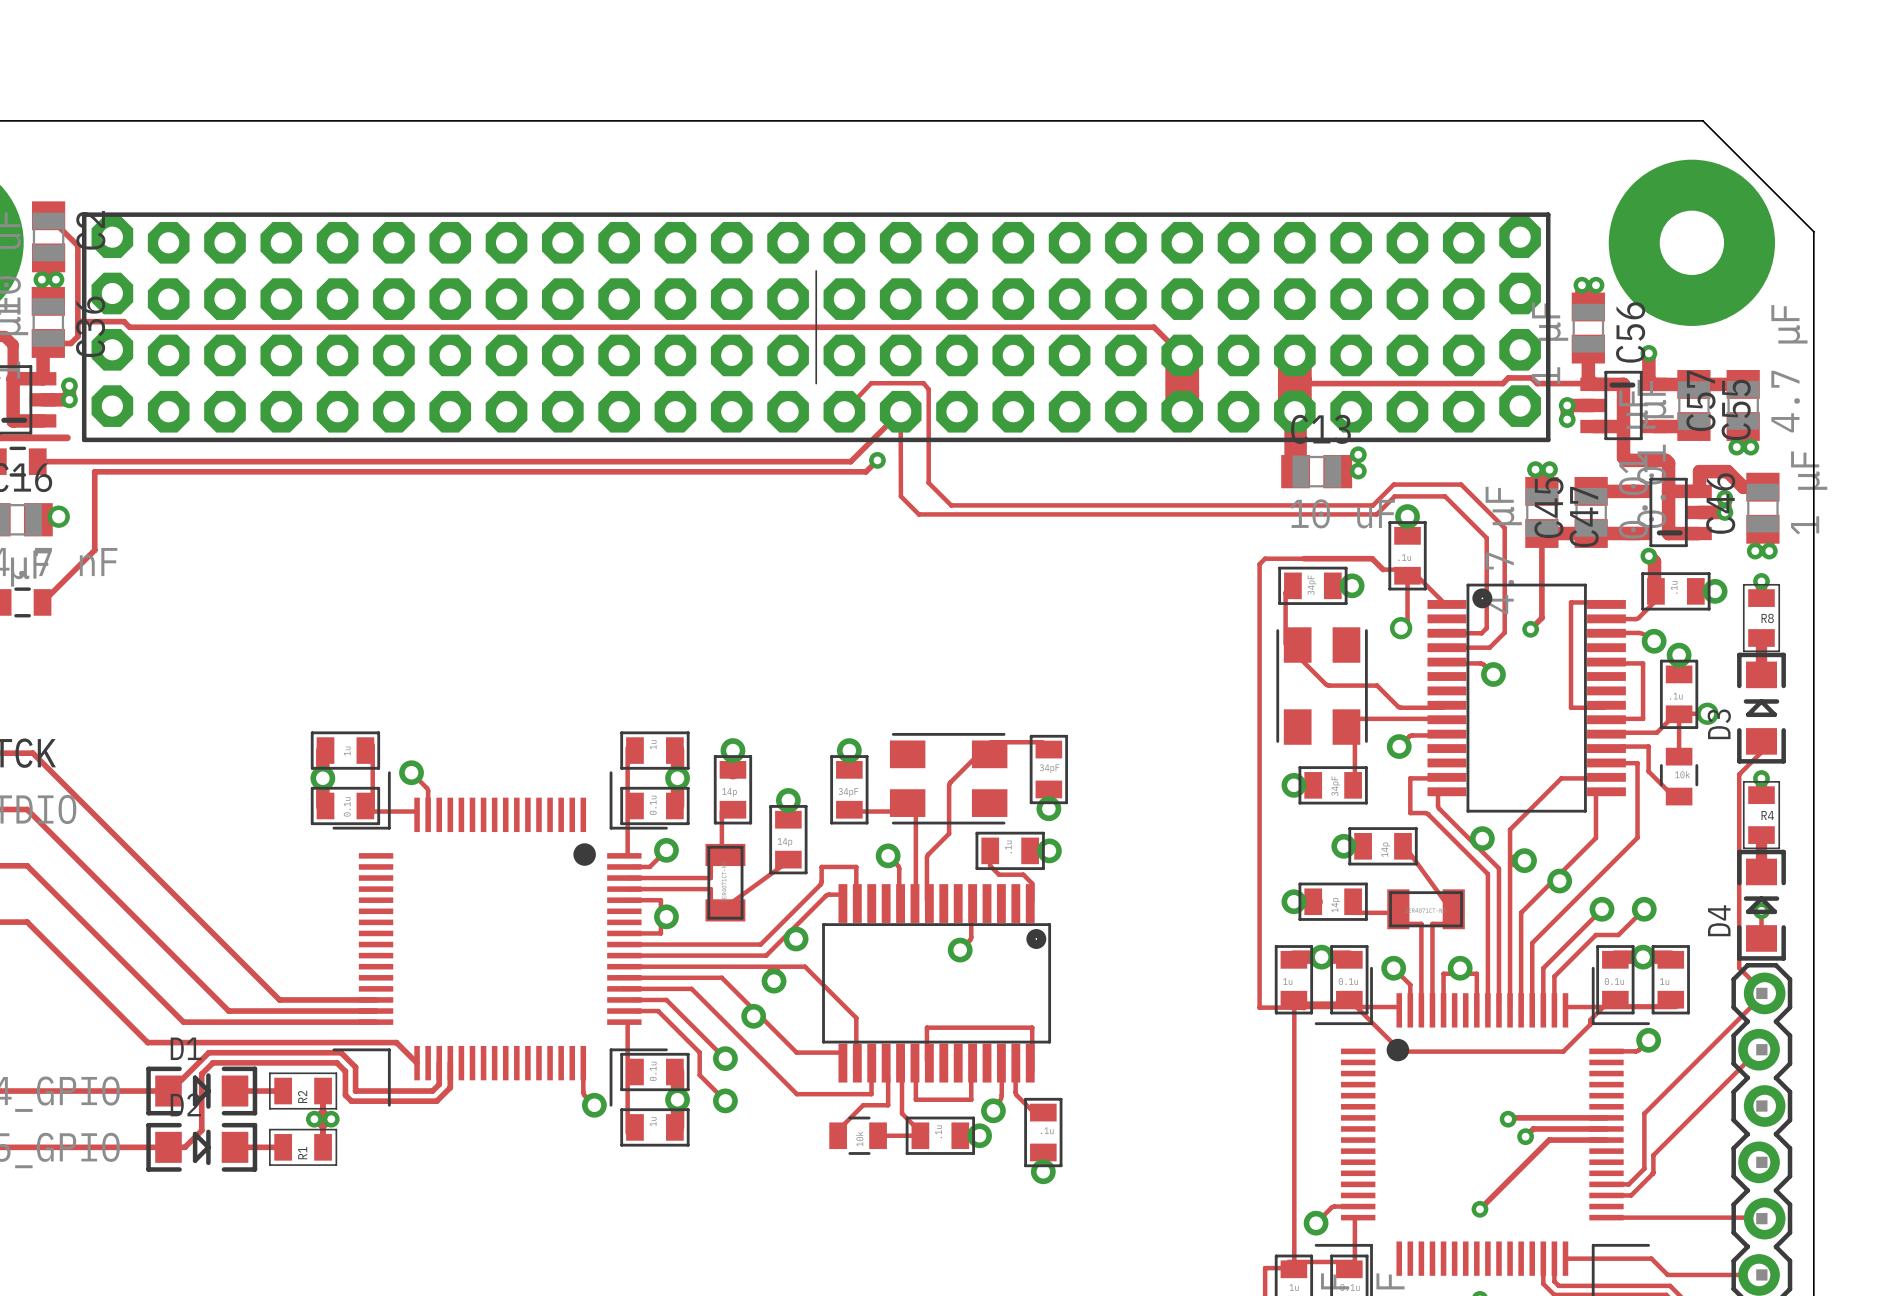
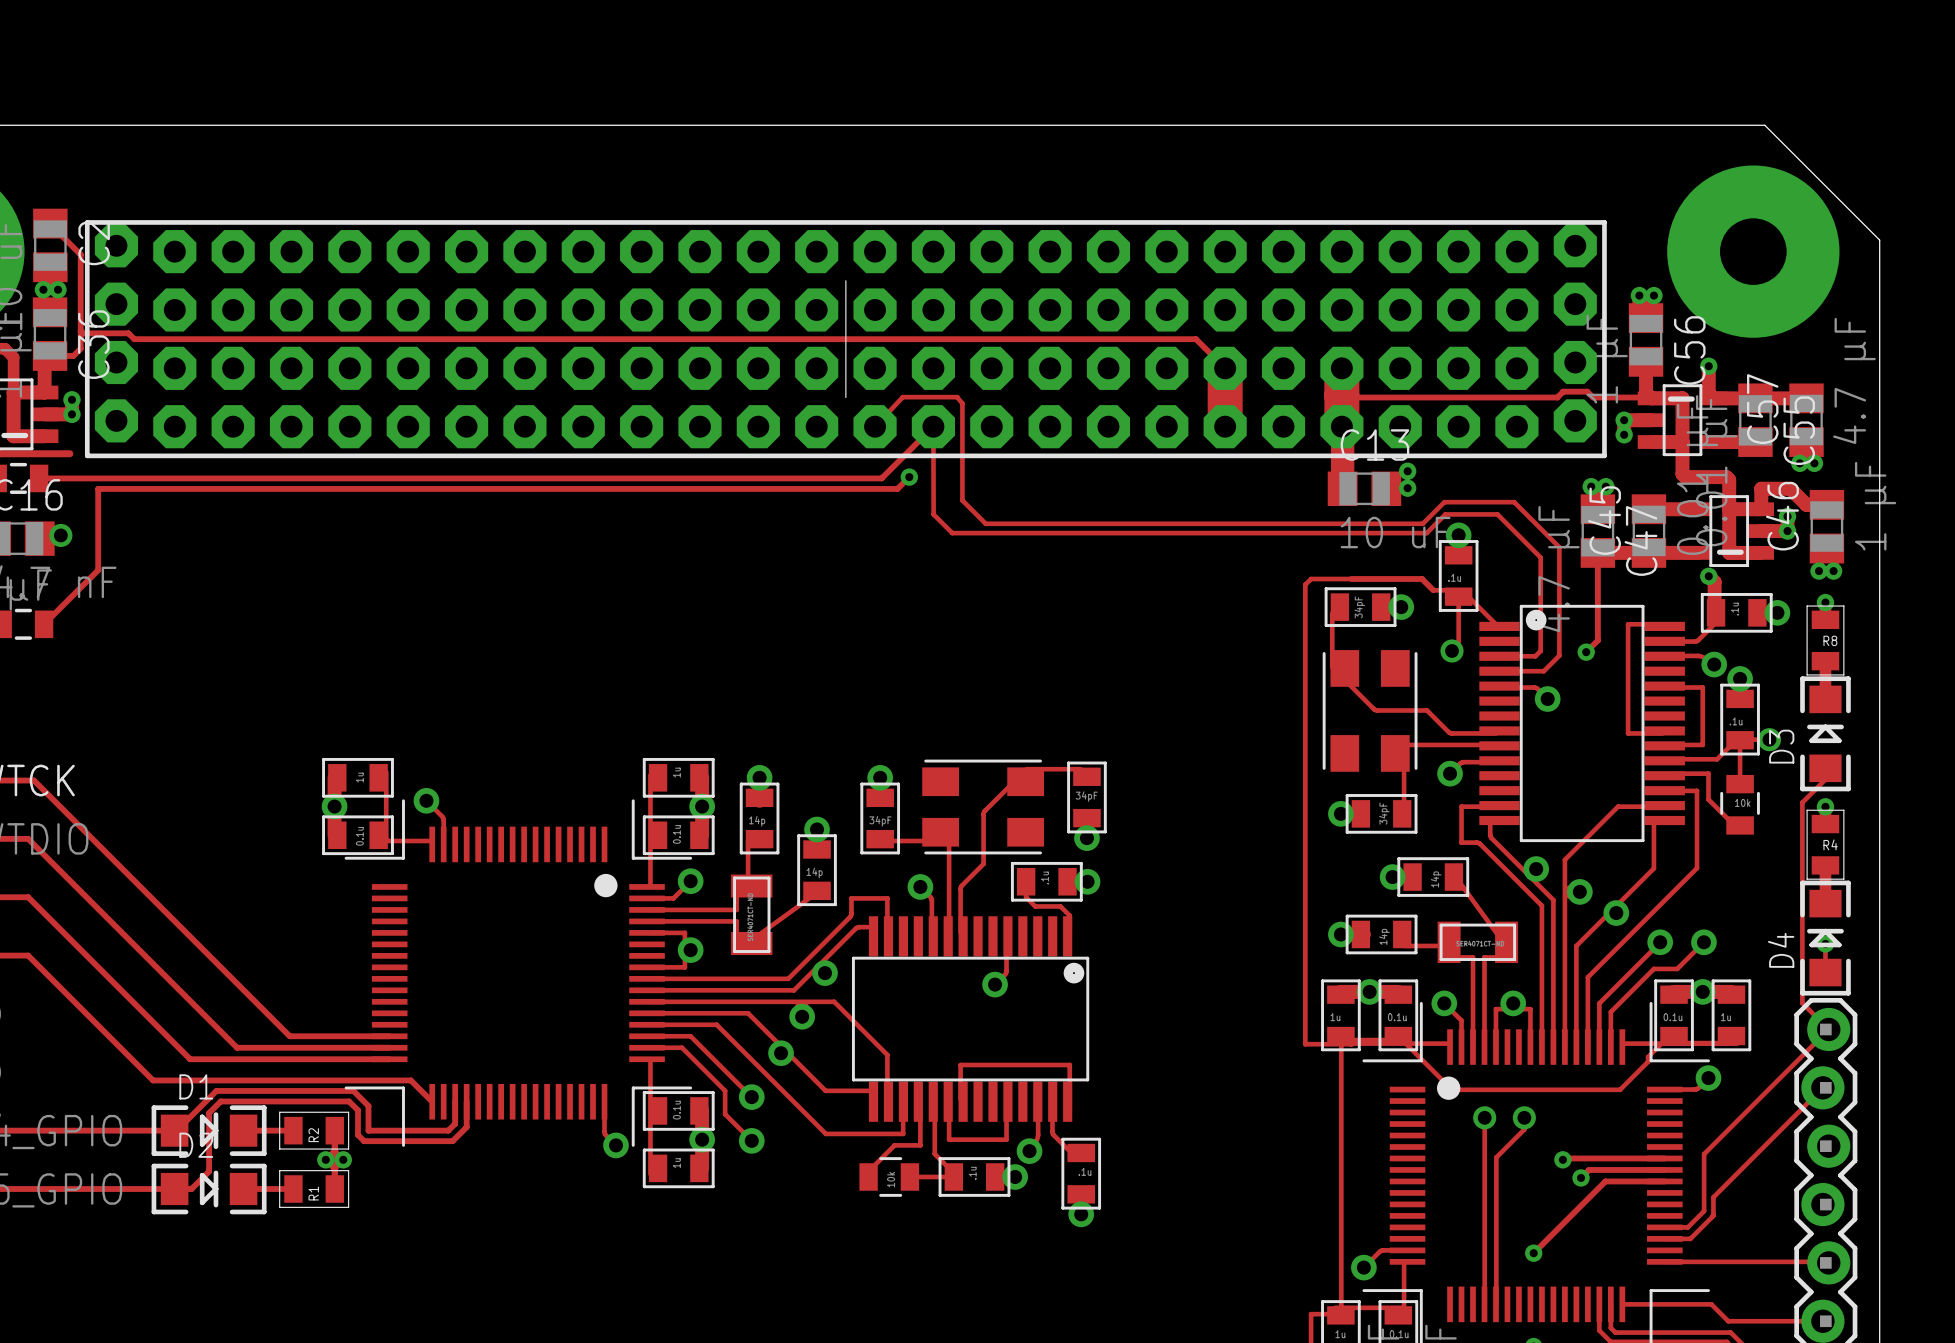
track: none -> (1484, 1117) (1484, 1304)
via: none -> (1484, 1117)
track: none -> (1524, 1117) (1524, 1129) (1496, 1157) (1495, 1304)
via: none -> (1524, 1117)

